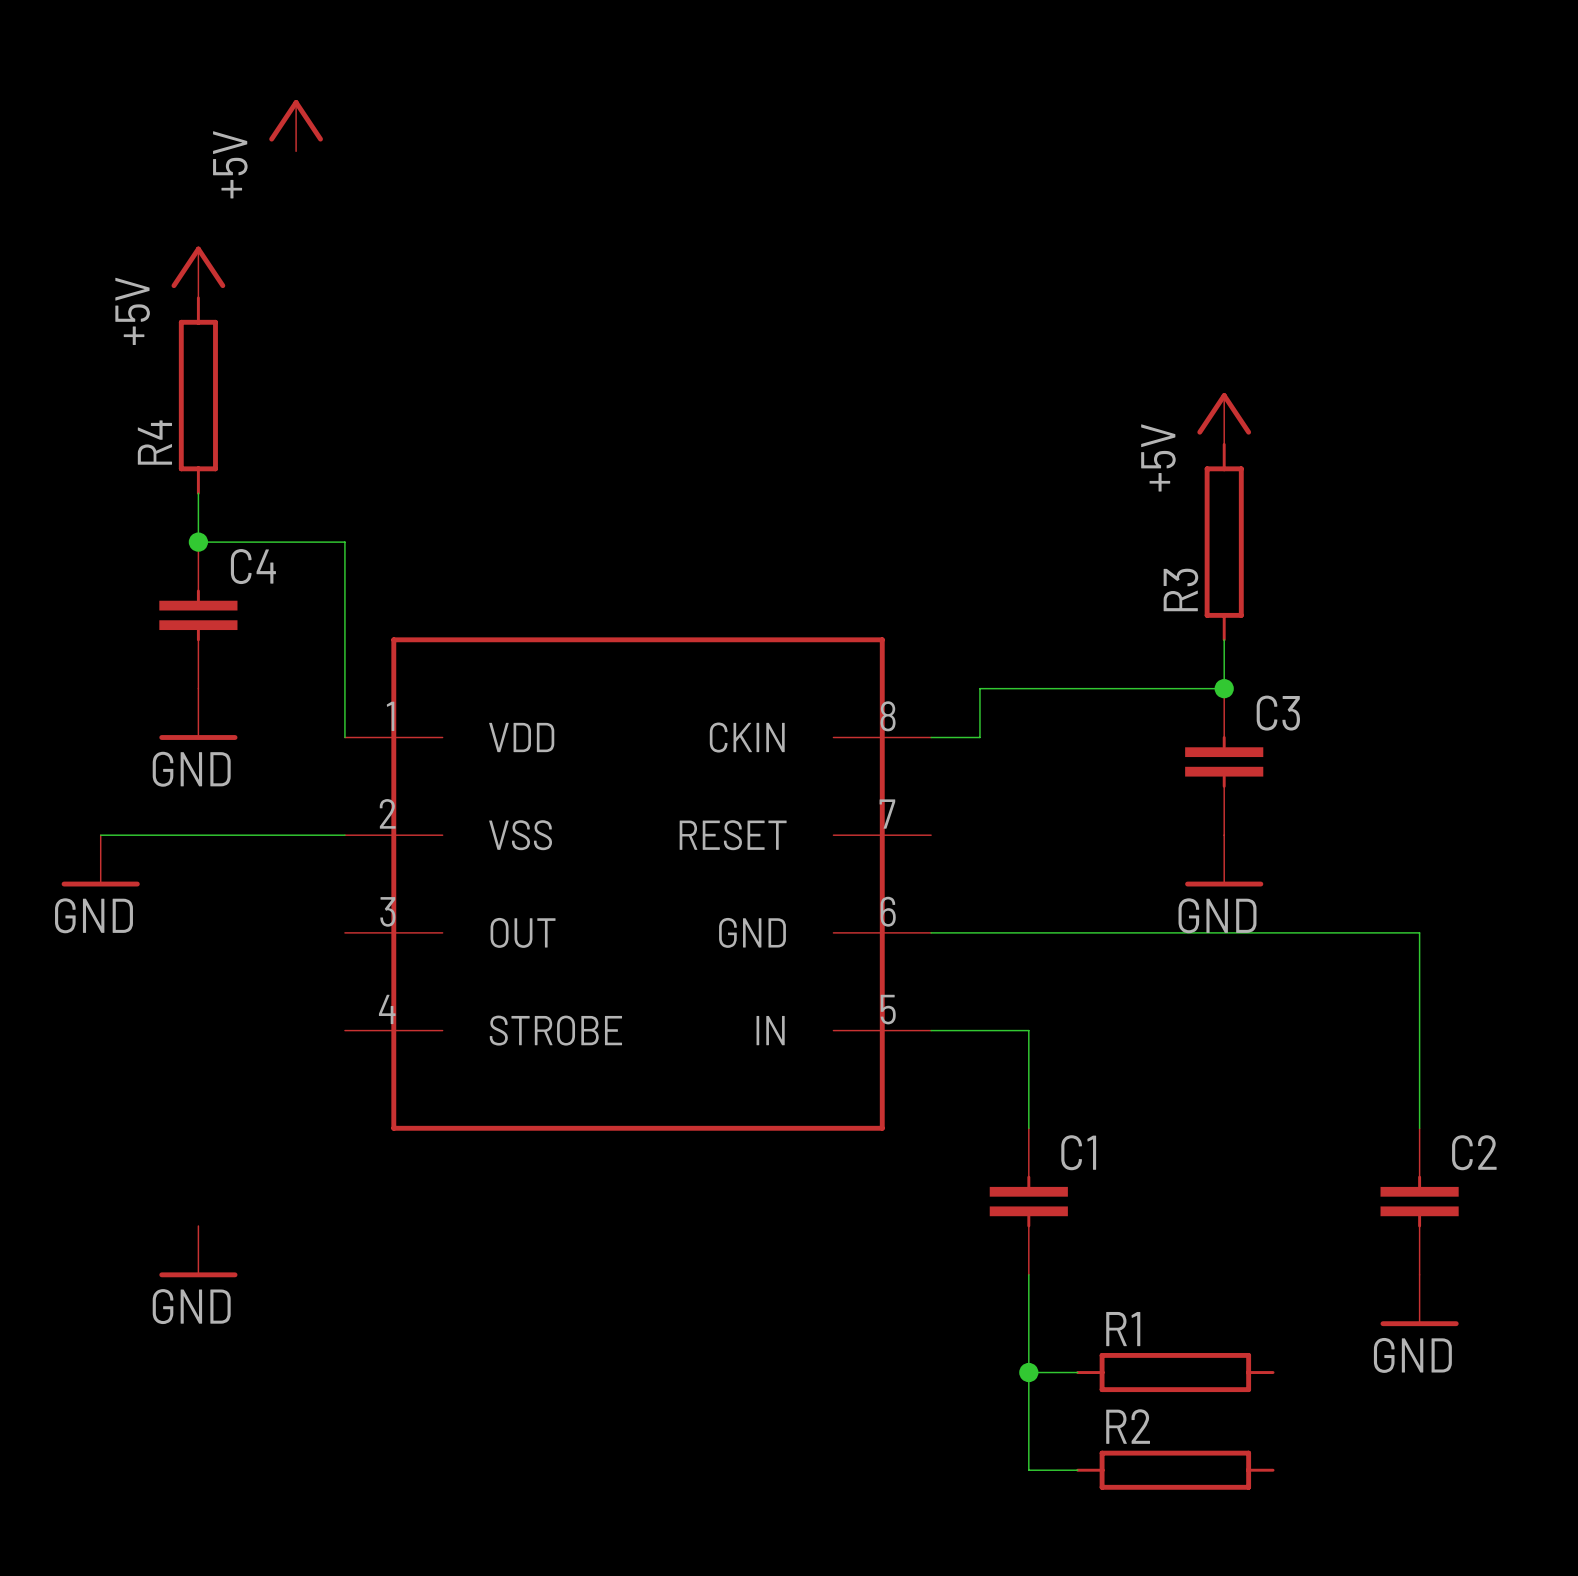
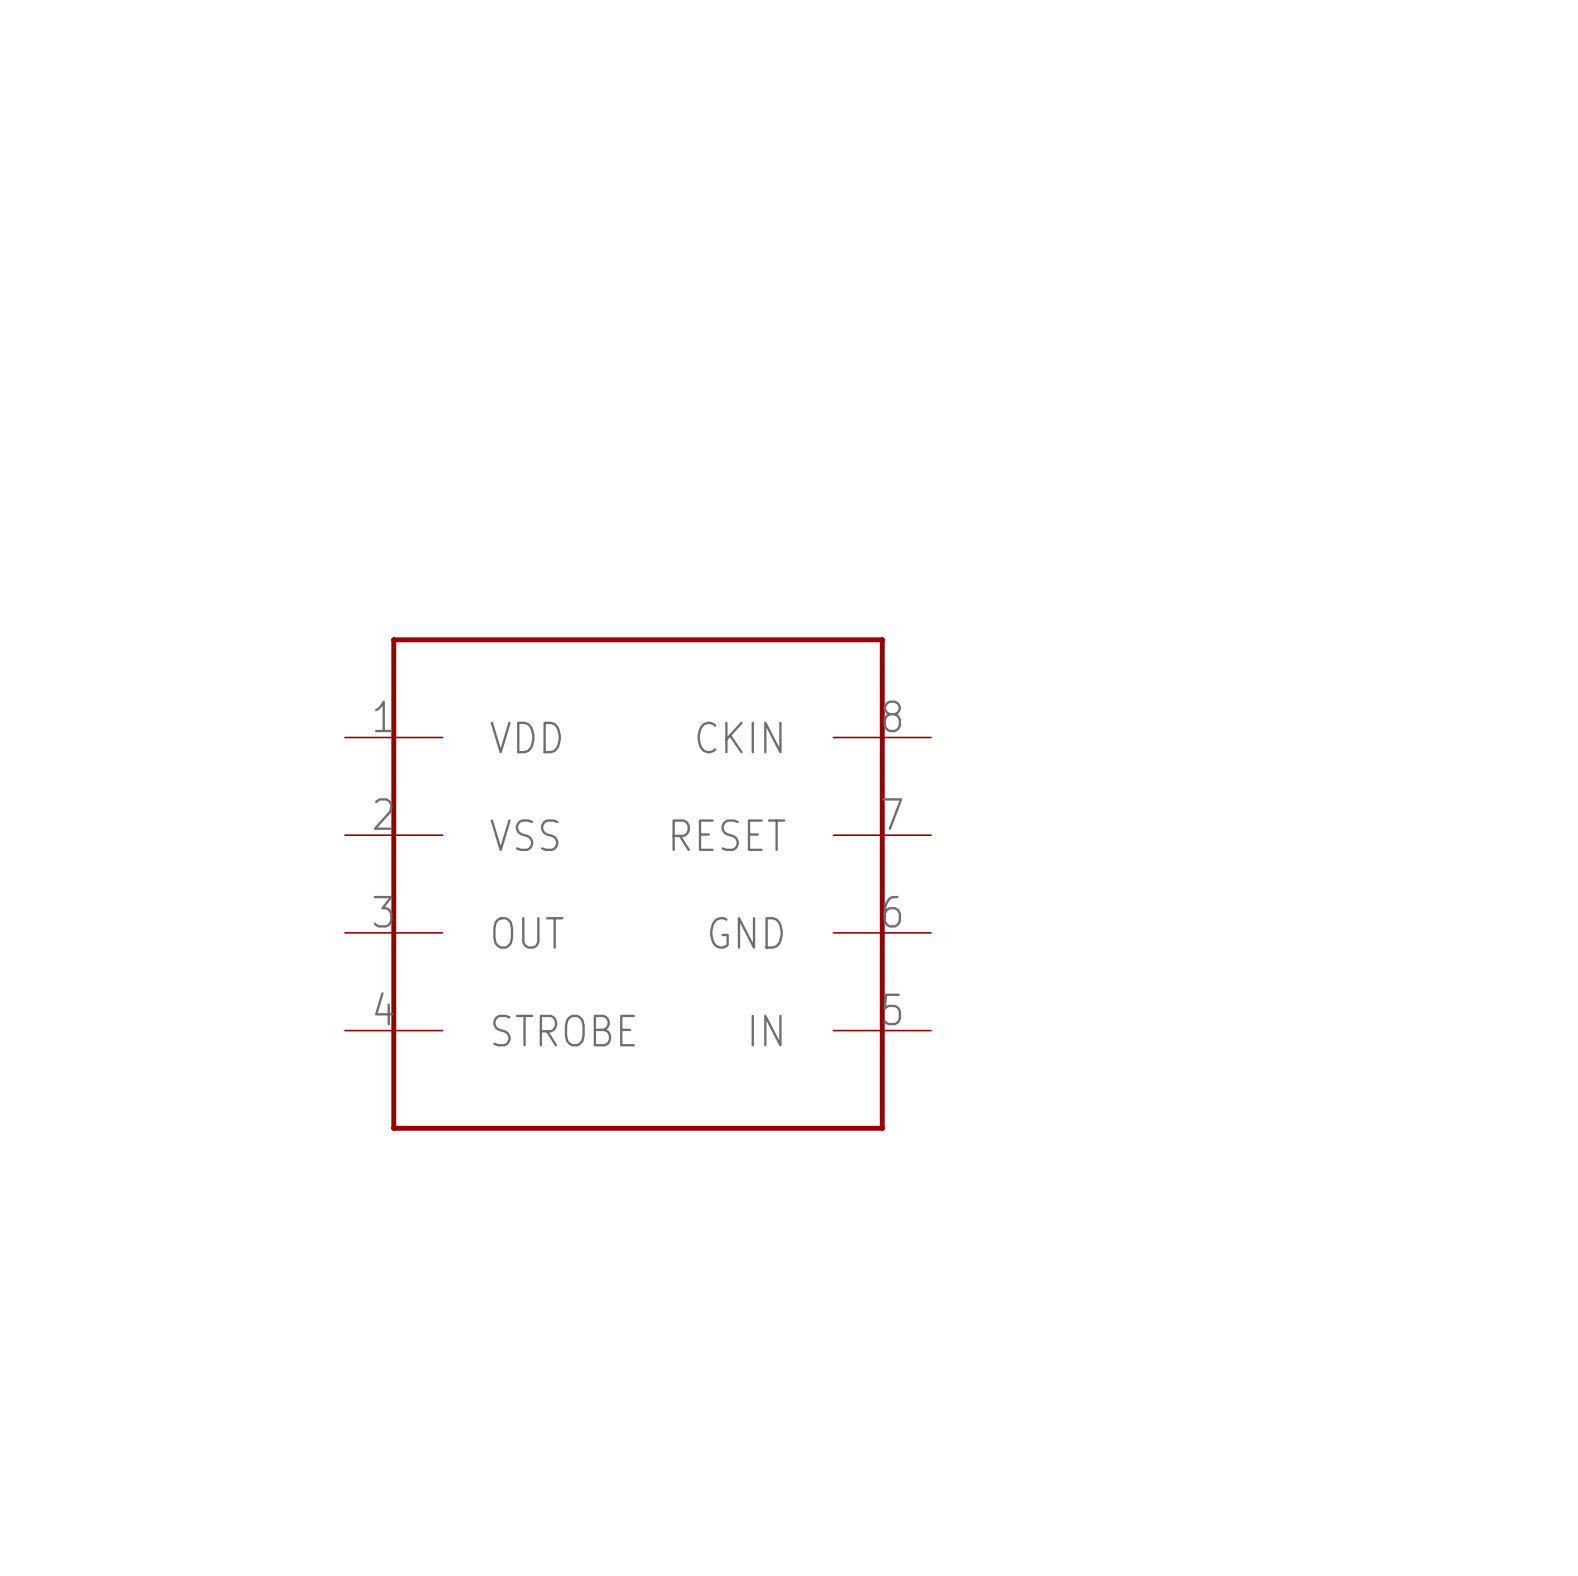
power symbol: +5V (296, 125) -> none
power symbol: +5V (198, 272) -> none
R4: (198, 395) -> none
power symbol: +5V (1224, 418) -> none
wire: (198, 493) (198, 542) (344, 542) (344, 737) -> none
junction: (198, 542) -> none
R3: (1224, 542) -> none
C4: (198, 615) -> none
wire: (1224, 639) (1224, 688) (979, 688) (979, 737) (931, 737) -> none
junction: (1224, 688) -> none
power symbol: GND (198, 714) -> none
C3: (1224, 761) -> none
wire: (100, 835) (344, 835) -> none
power symbol: GND (100, 860) -> none
power symbol: GND (1224, 860) -> none
wire: (931, 932) (1419, 932) (1419, 1128) -> none
wire: (931, 1030) (1028, 1030) (1028, 1128) -> none
C1: (1028, 1201) -> none
C2: (1419, 1201) -> none
power symbol: GND (198, 1251) -> none
wire: (1028, 1274) (1028, 1470) (1077, 1470) -> none
power symbol: GND (1419, 1300) -> none
wire: (1028, 1372) (1077, 1372) -> none
junction: (1028, 1372) -> none
R1: (1175, 1372) -> none
R2: (1175, 1470) -> none

